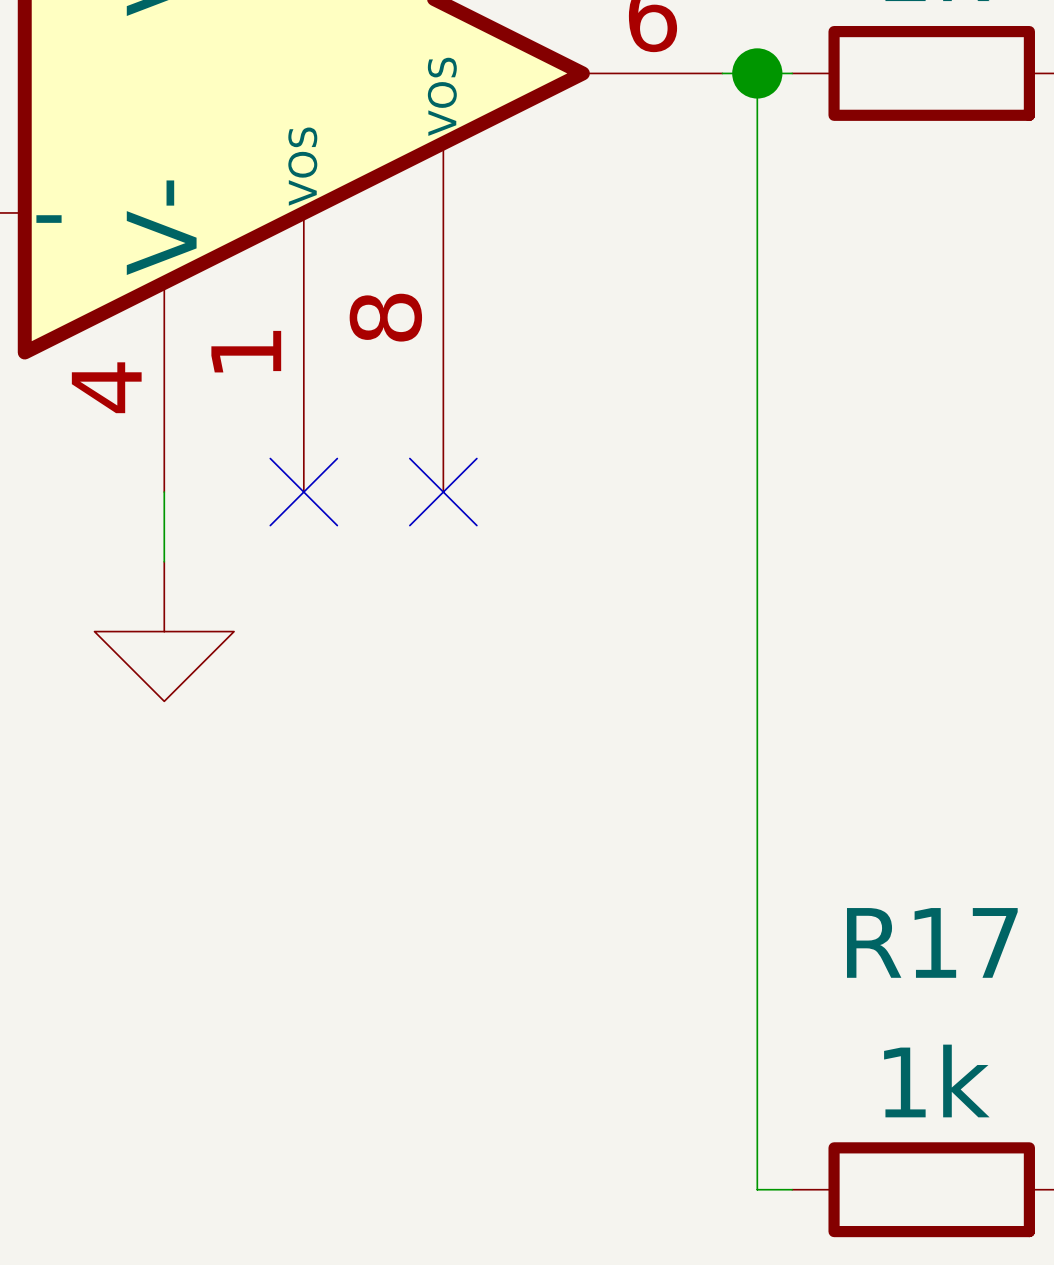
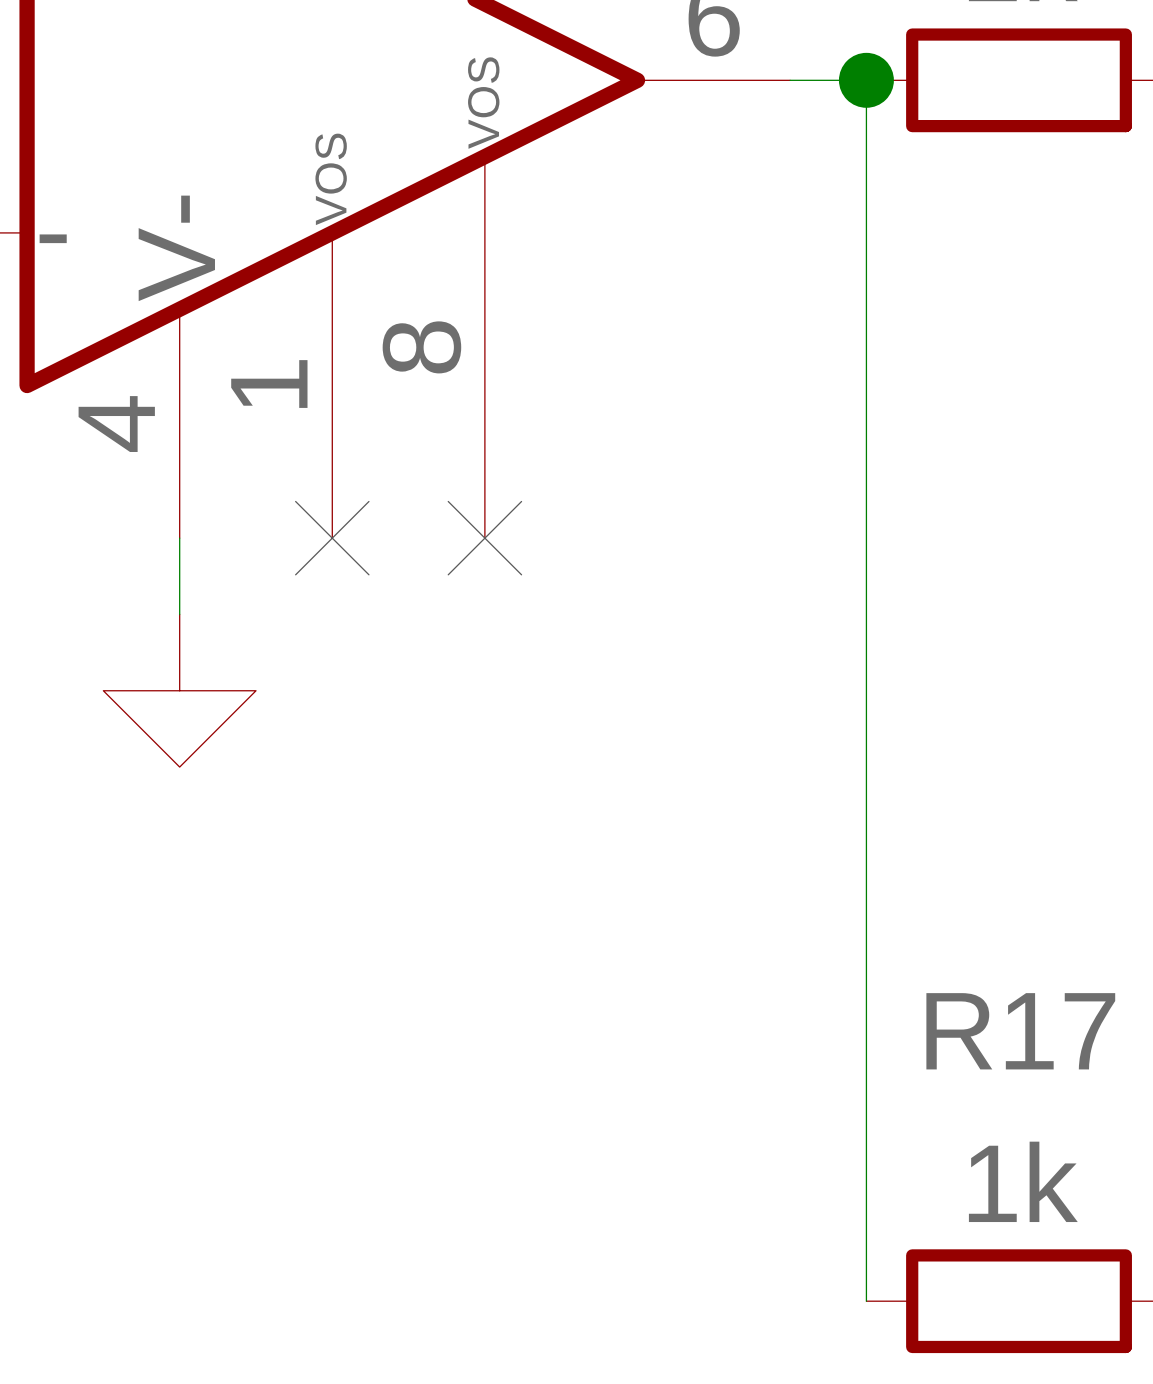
wire: (757, 73) (757, 1189) (792, 1189) -> (866, 80) (866, 1301)
junction position: (757, 73) -> (866, 80)

